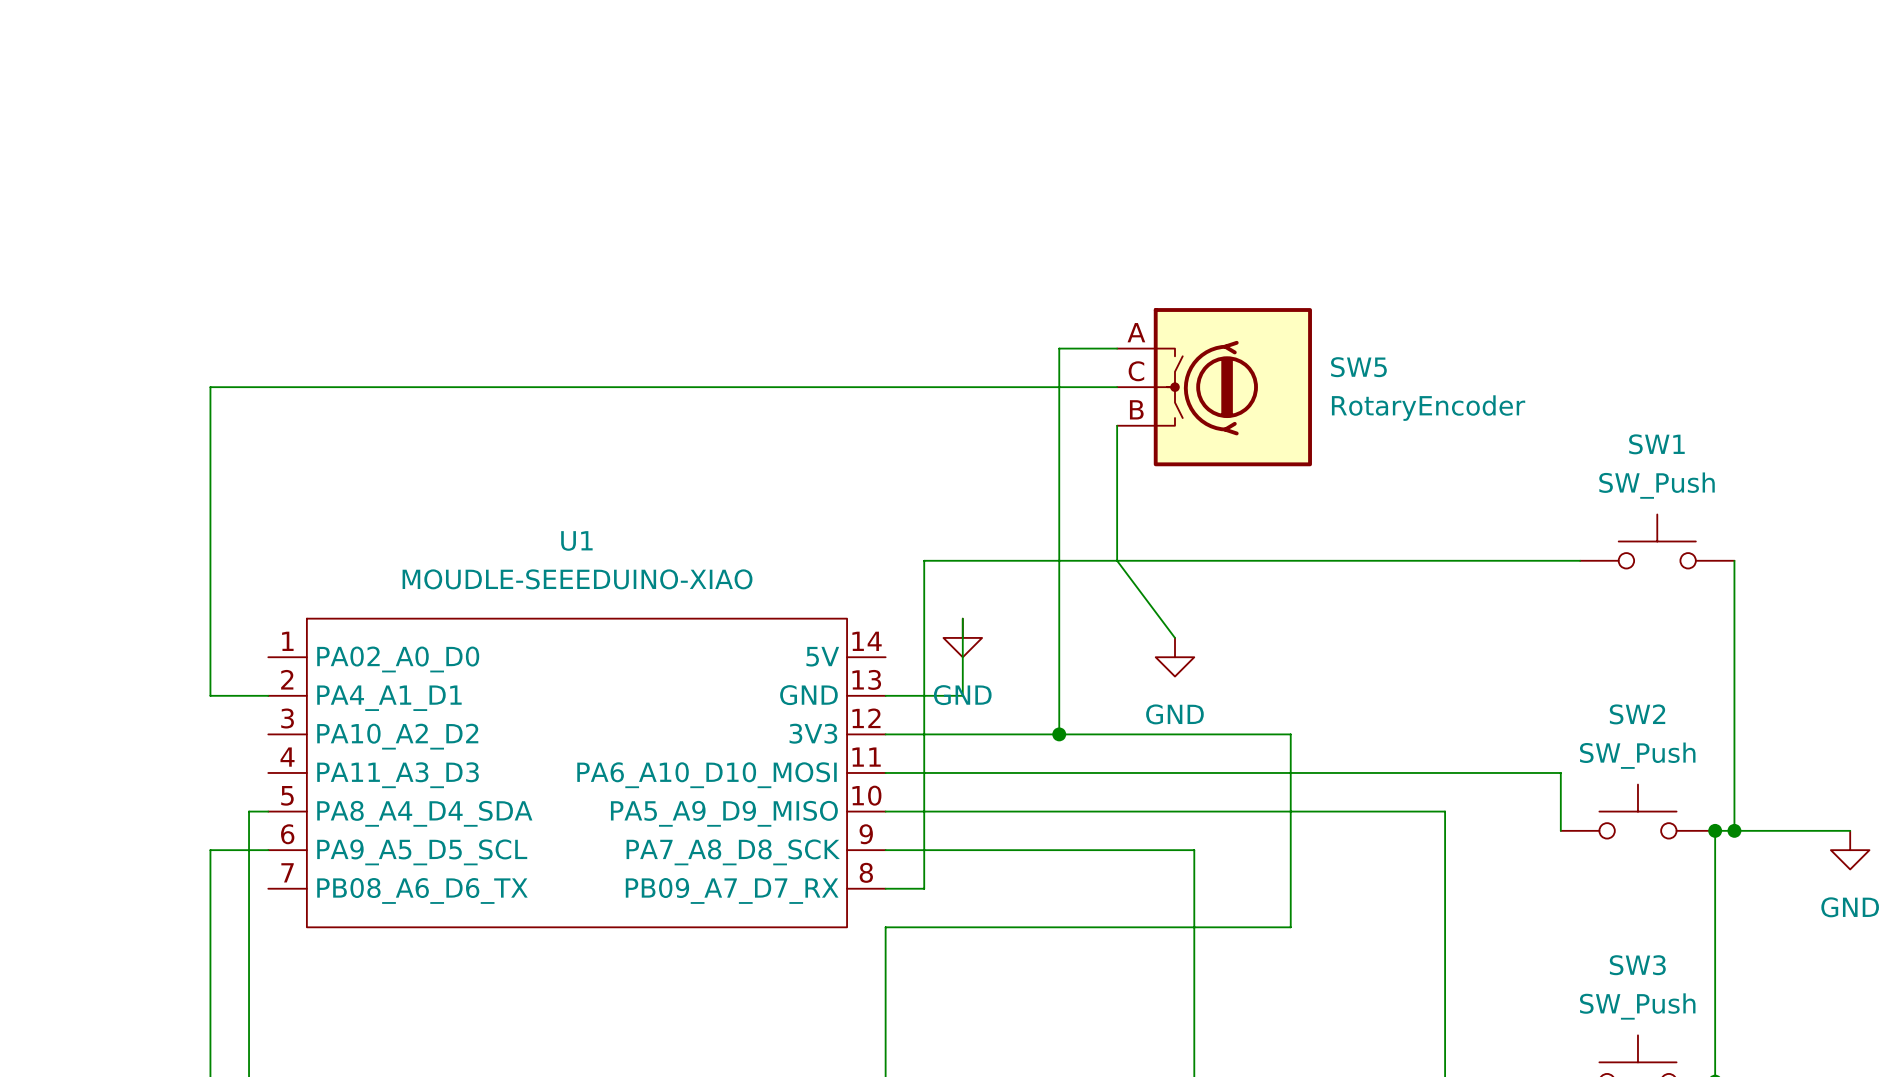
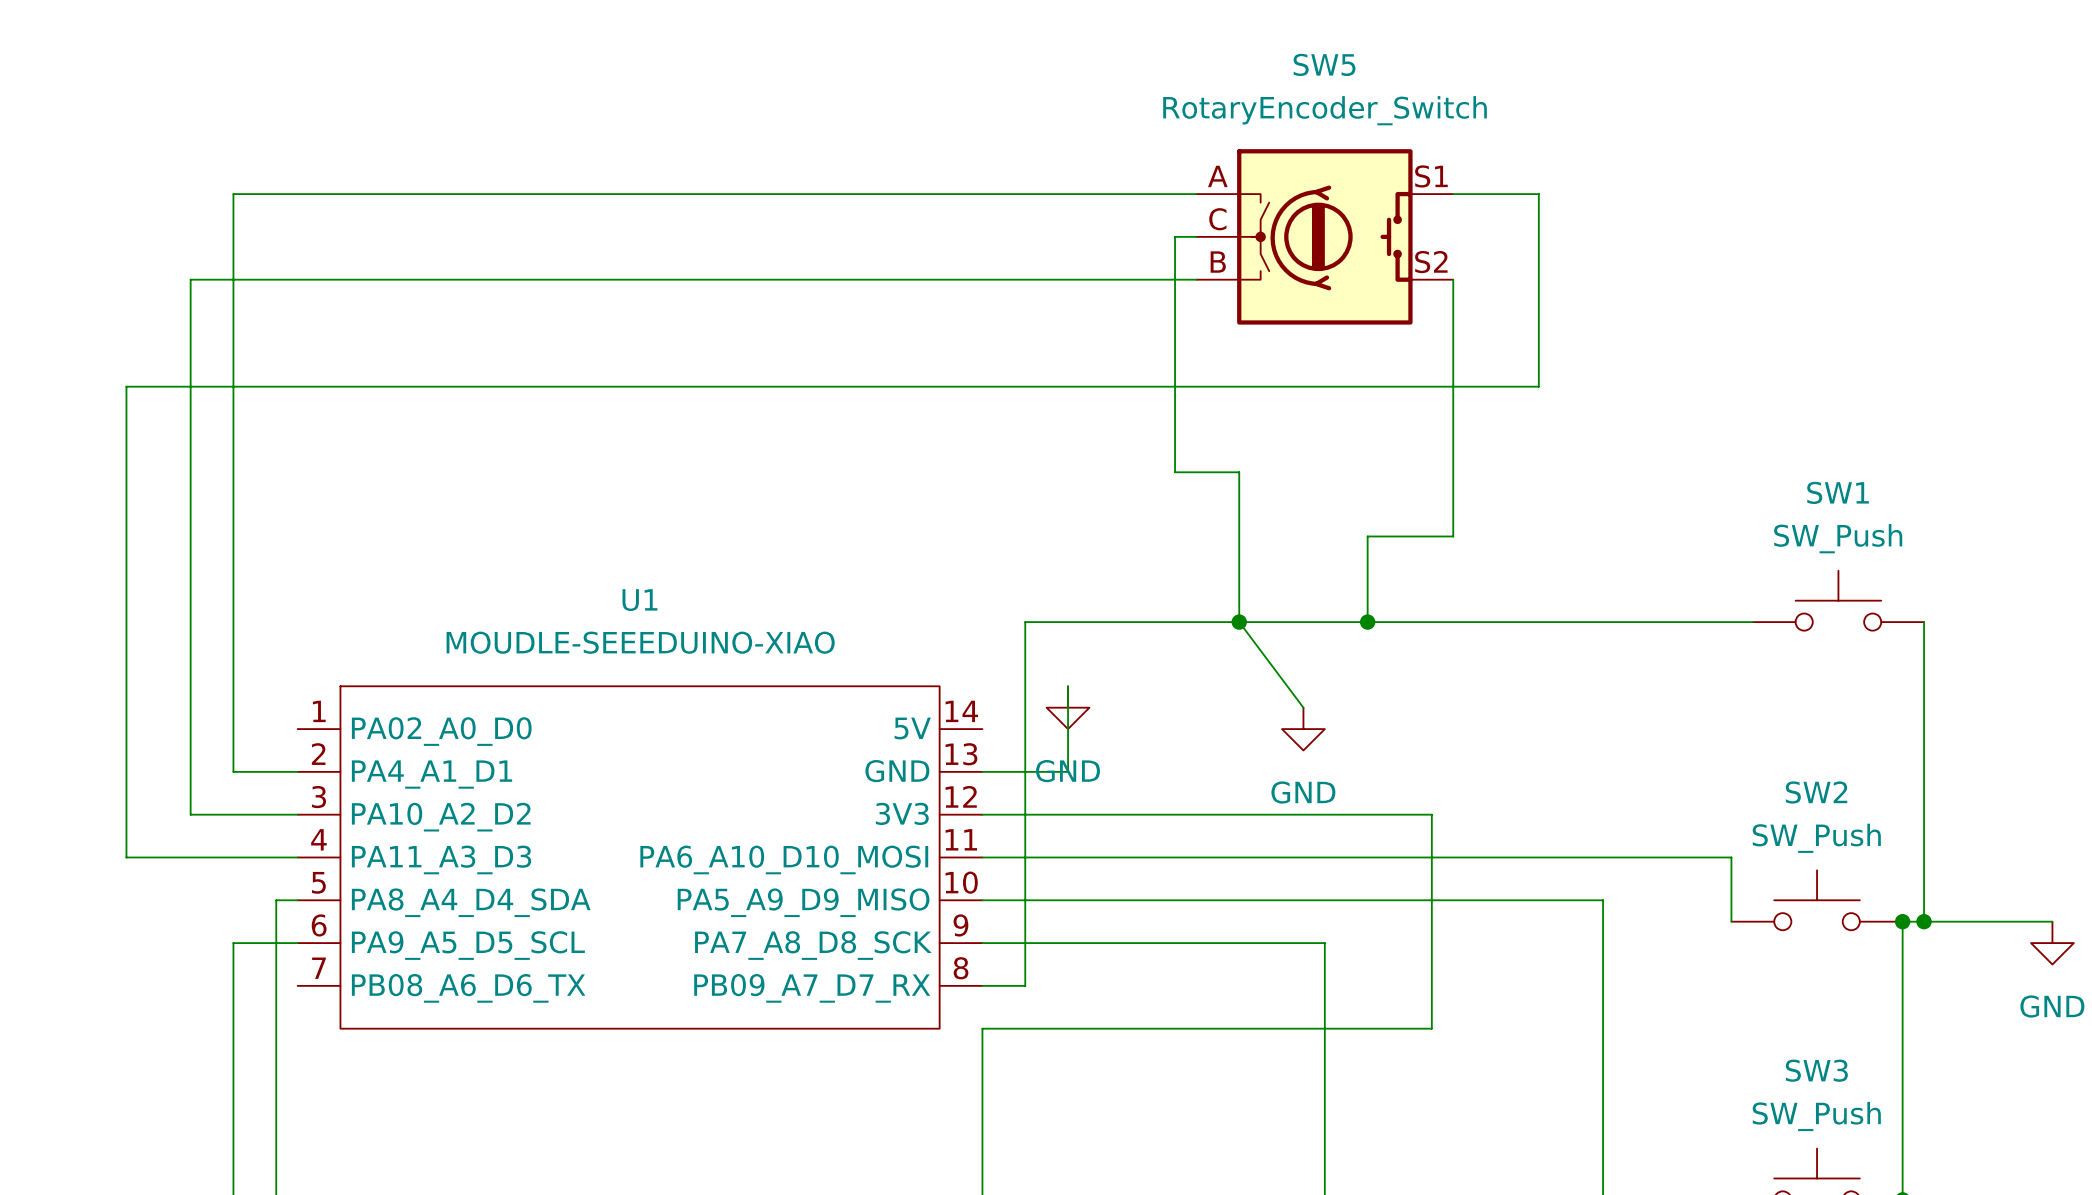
wire: none -> (1453, 194) (1538, 194) (1538, 386) (1239, 386)
wire: none -> (1196, 236) (1175, 236) (1175, 386) (126, 386) (126, 857) (297, 857)
wire: none -> (1196, 279) (190, 279) (190, 814) (297, 814)
wire: none -> (1453, 279) (1453, 536) (1367, 536) (1367, 622)
SW5 symbol: [1117, 308, 1312, 467] -> [1196, 149, 1454, 325]
SW5 name position: SW5 (1358, 367) -> SW5 (1324, 64)
wire: (210, 387) (1117, 387) -> (233, 429) (233, 194) (1196, 194)
SW5 value: RotaryEncoder (1428, 408) -> RotaryEncoder_Switch (1325, 110)
wire: (1059, 425) (1059, 734) -> (1175, 472) (1239, 472)
junction: none -> (1239, 622)
junction: none -> (1367, 622)
junction: (1059, 734) -> none

